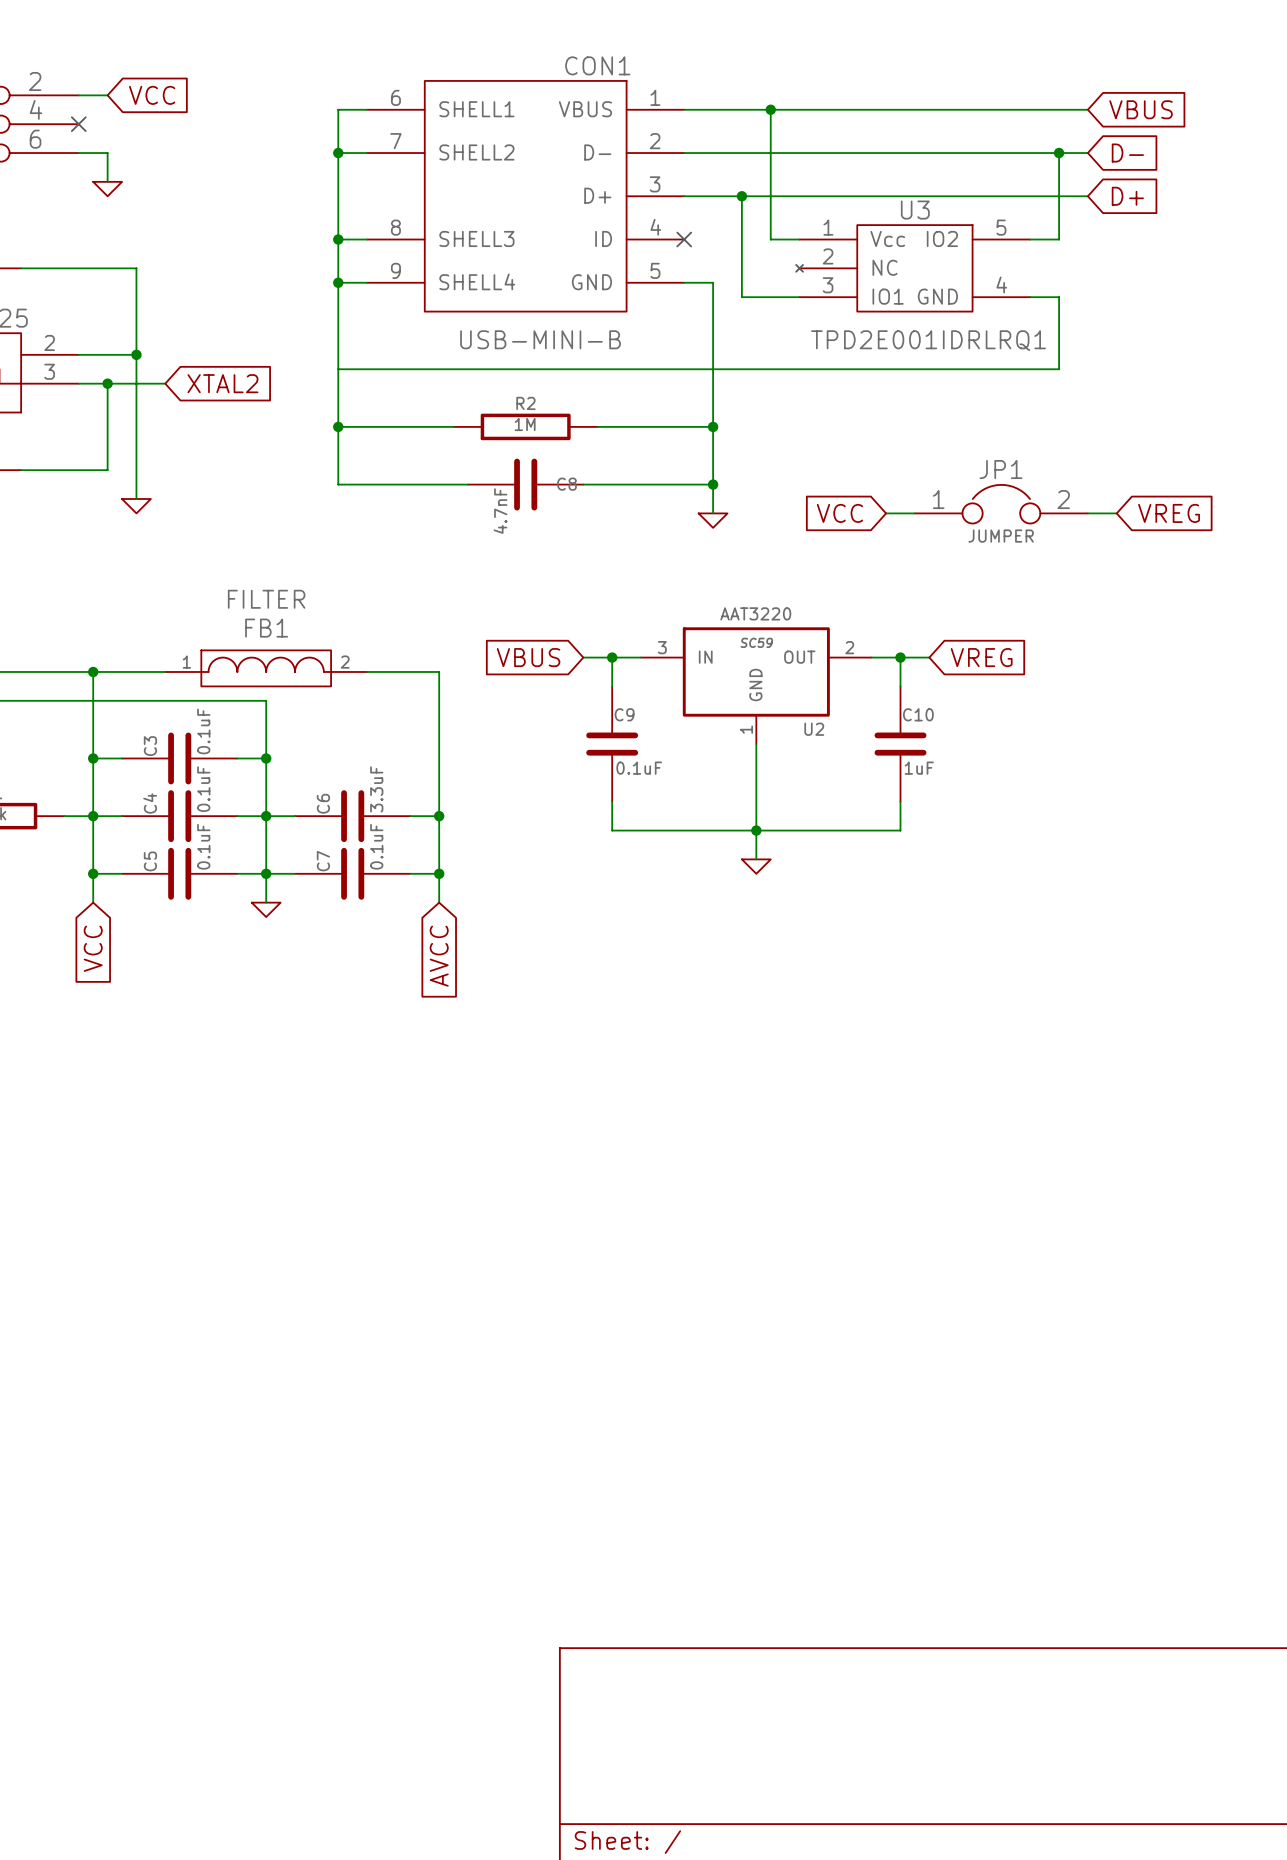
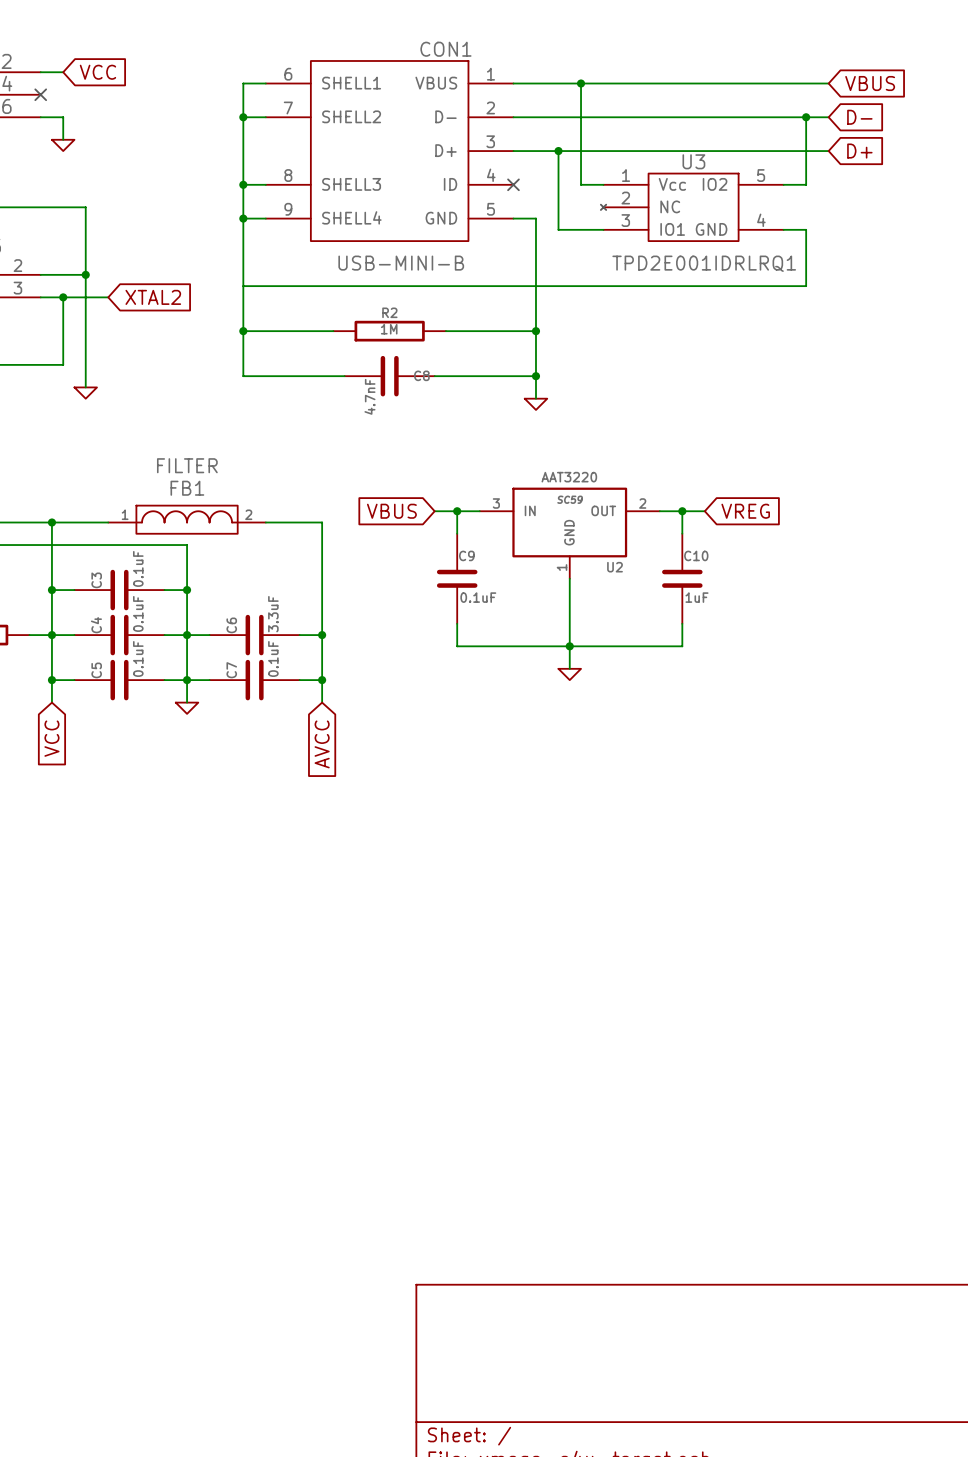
JP1: JUMPER (1001, 504) -> none
global label: VCC (839, 513) -> none
wire: (886, 513) (914, 513) -> none
wire: (1087, 513) (1116, 513) -> none
global label: VREG (1169, 513) -> none

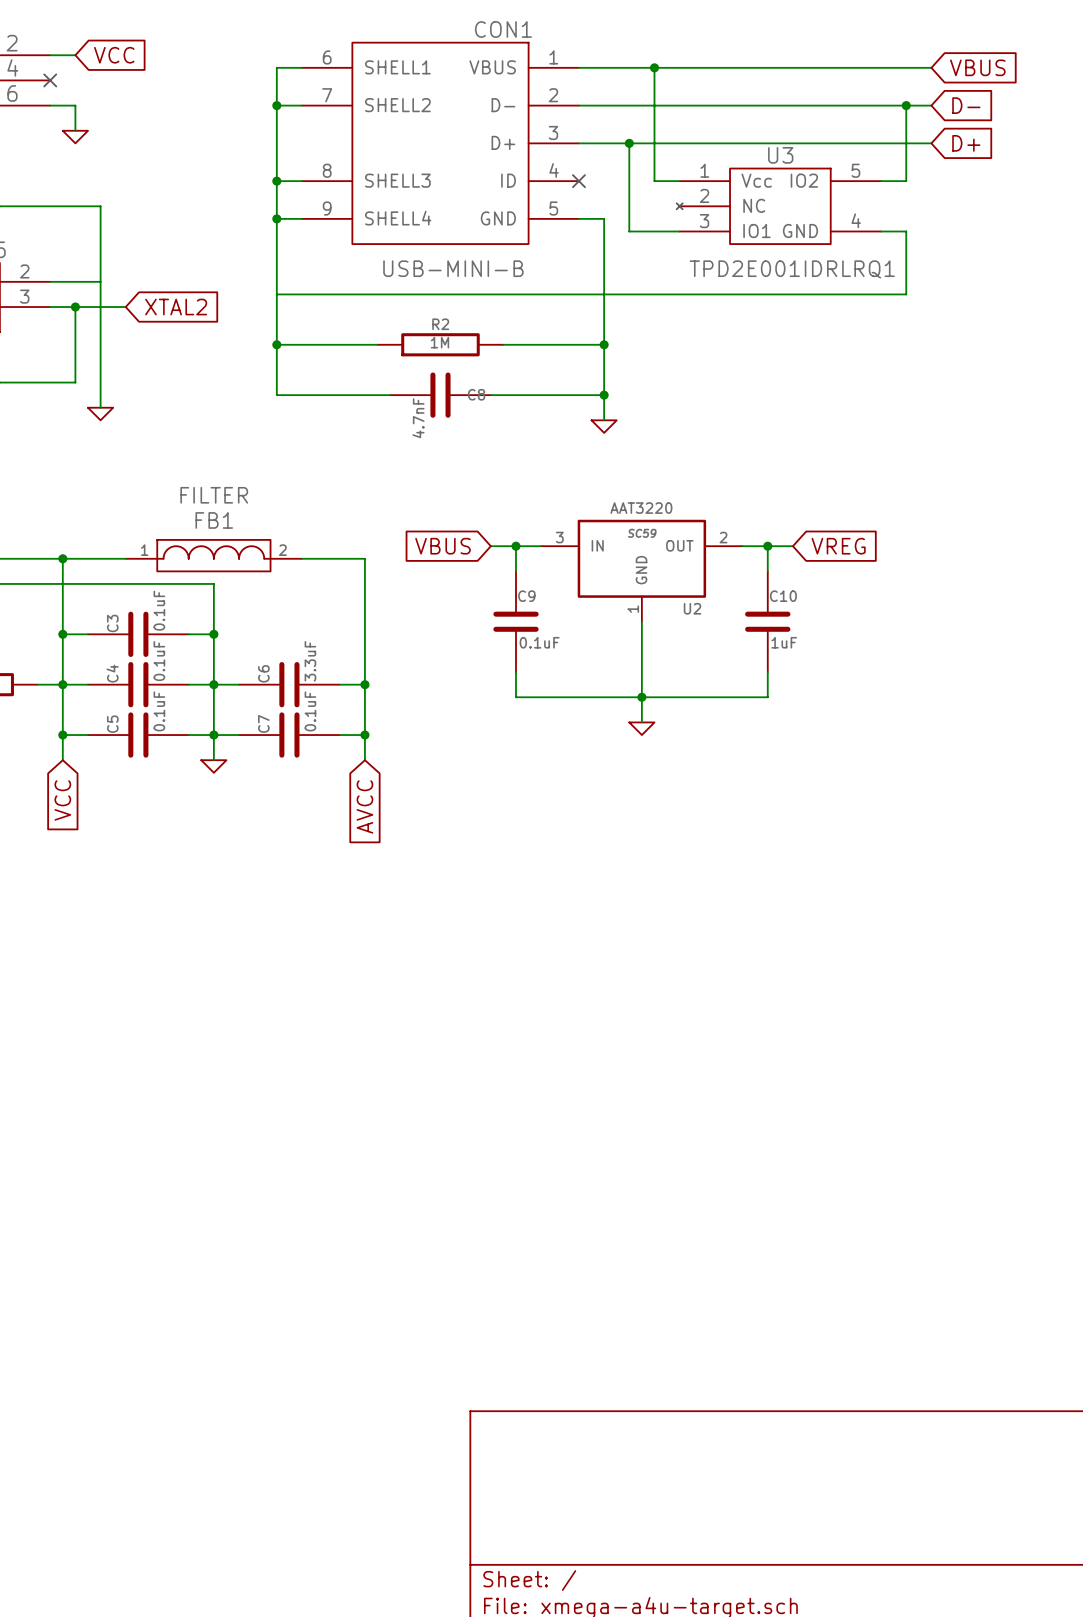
junction: (85, 274) -> none

